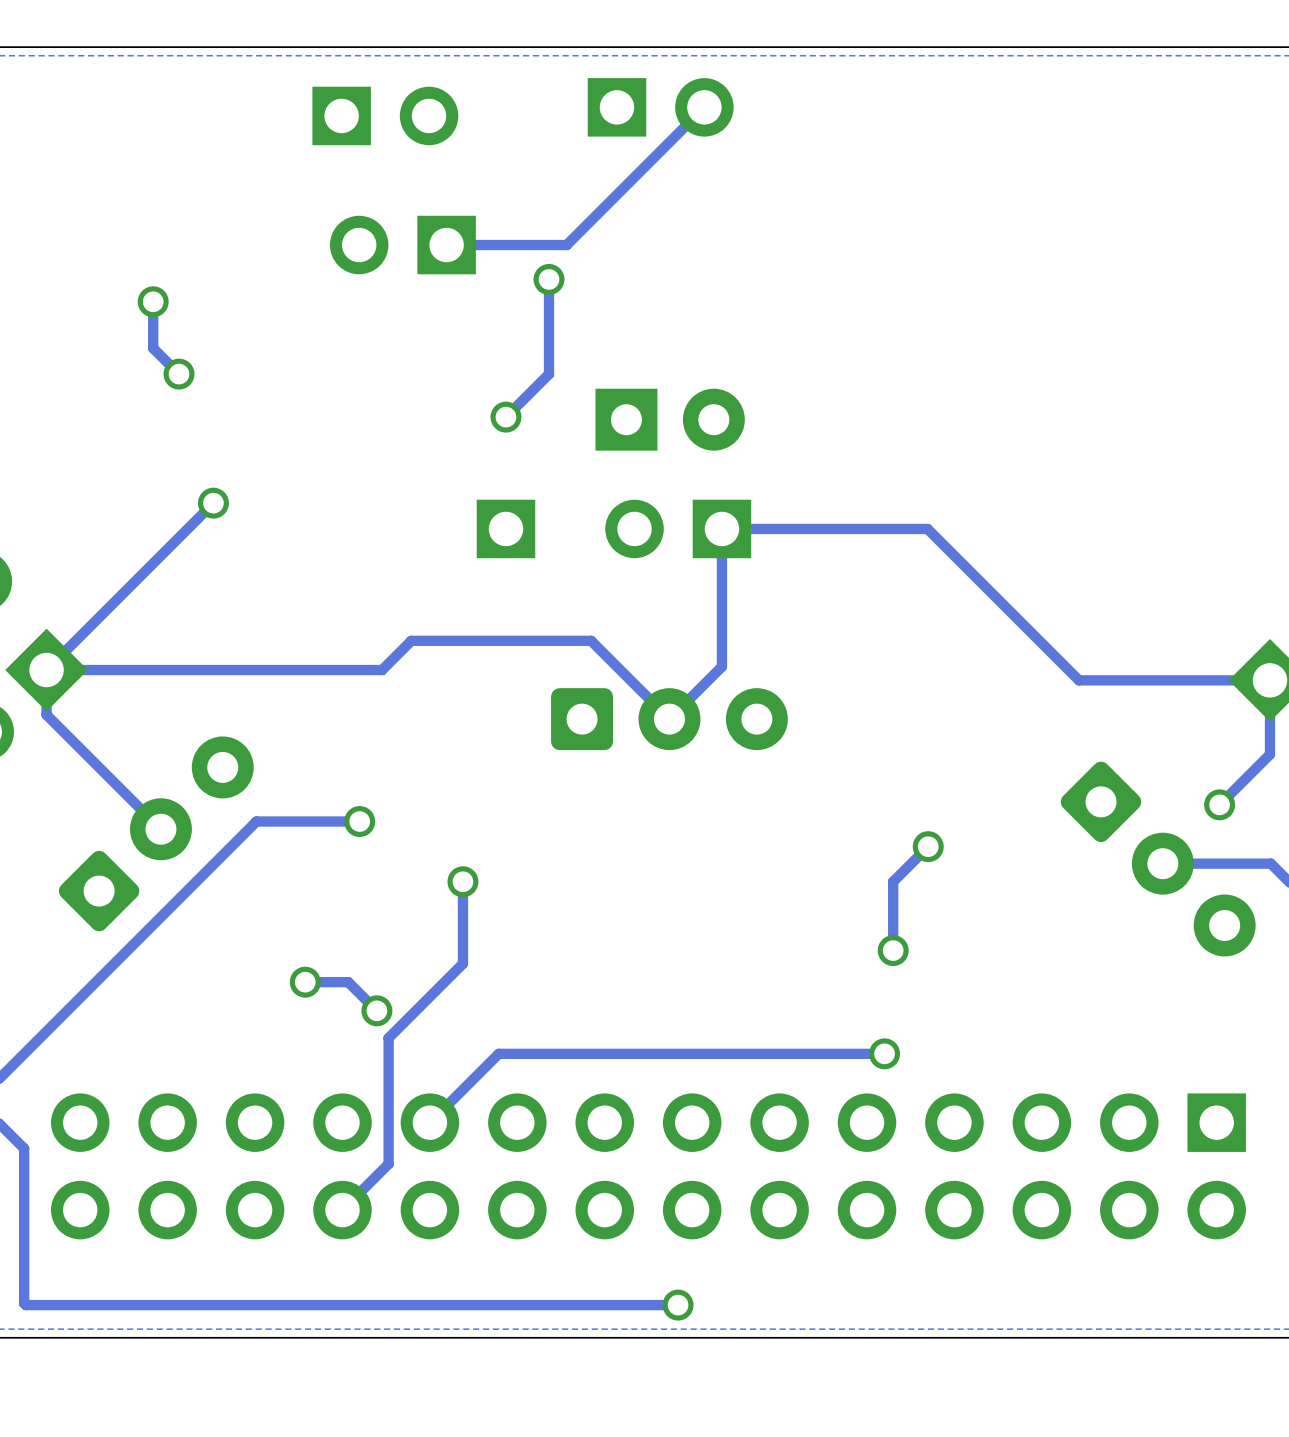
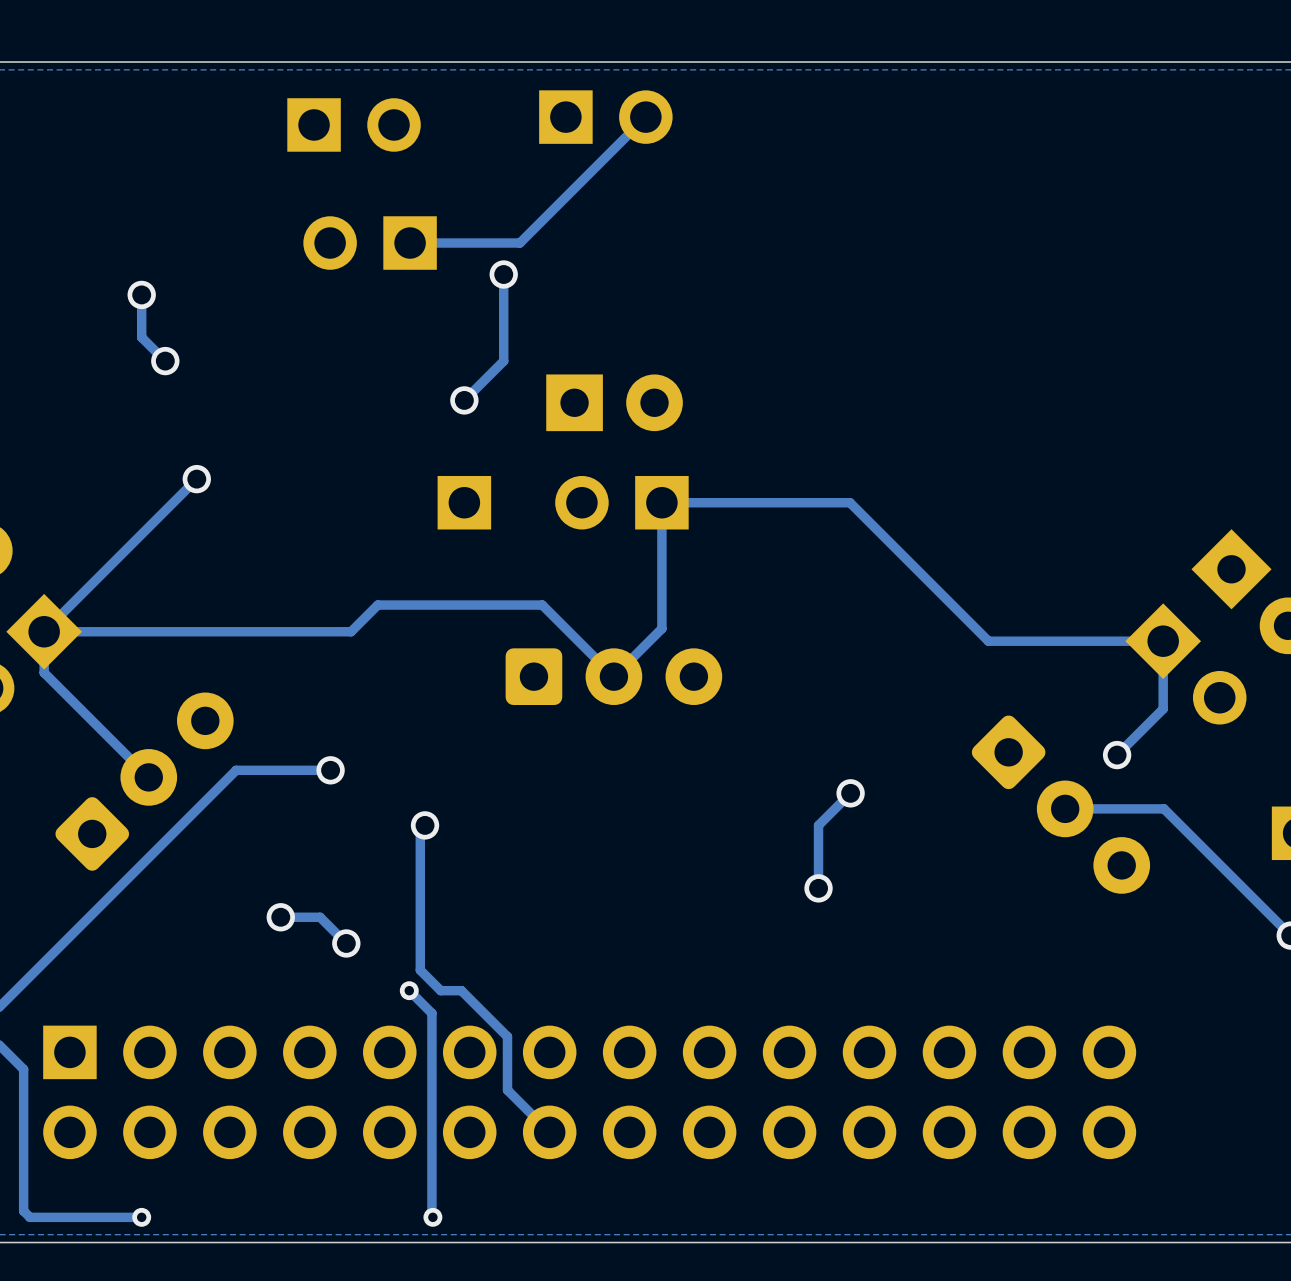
track: (462, 881) (462, 963) (388, 1038) (388, 1163) (342, 1210) -> (425, 825) (420, 830) (420, 970) (440, 990) (461, 990) (507, 1036) (507, 1090) (549, 1132)
track: (884, 1053) (498, 1053) (429, 1122) -> none
via: (884, 1053) -> none
track: none -> (409, 990) (431, 1013) (432, 1217)
via: none -> (409, 990)
part footprint: [50, 1093, 1246, 1240] -> [43, 1025, 1137, 1160]
track: (678, 1305) (25, 1305) -> (141, 1217) (29, 1217) (25, 1212)
via: (678, 1305) -> none
via: none -> (141, 1217)
via: none -> (432, 1217)

